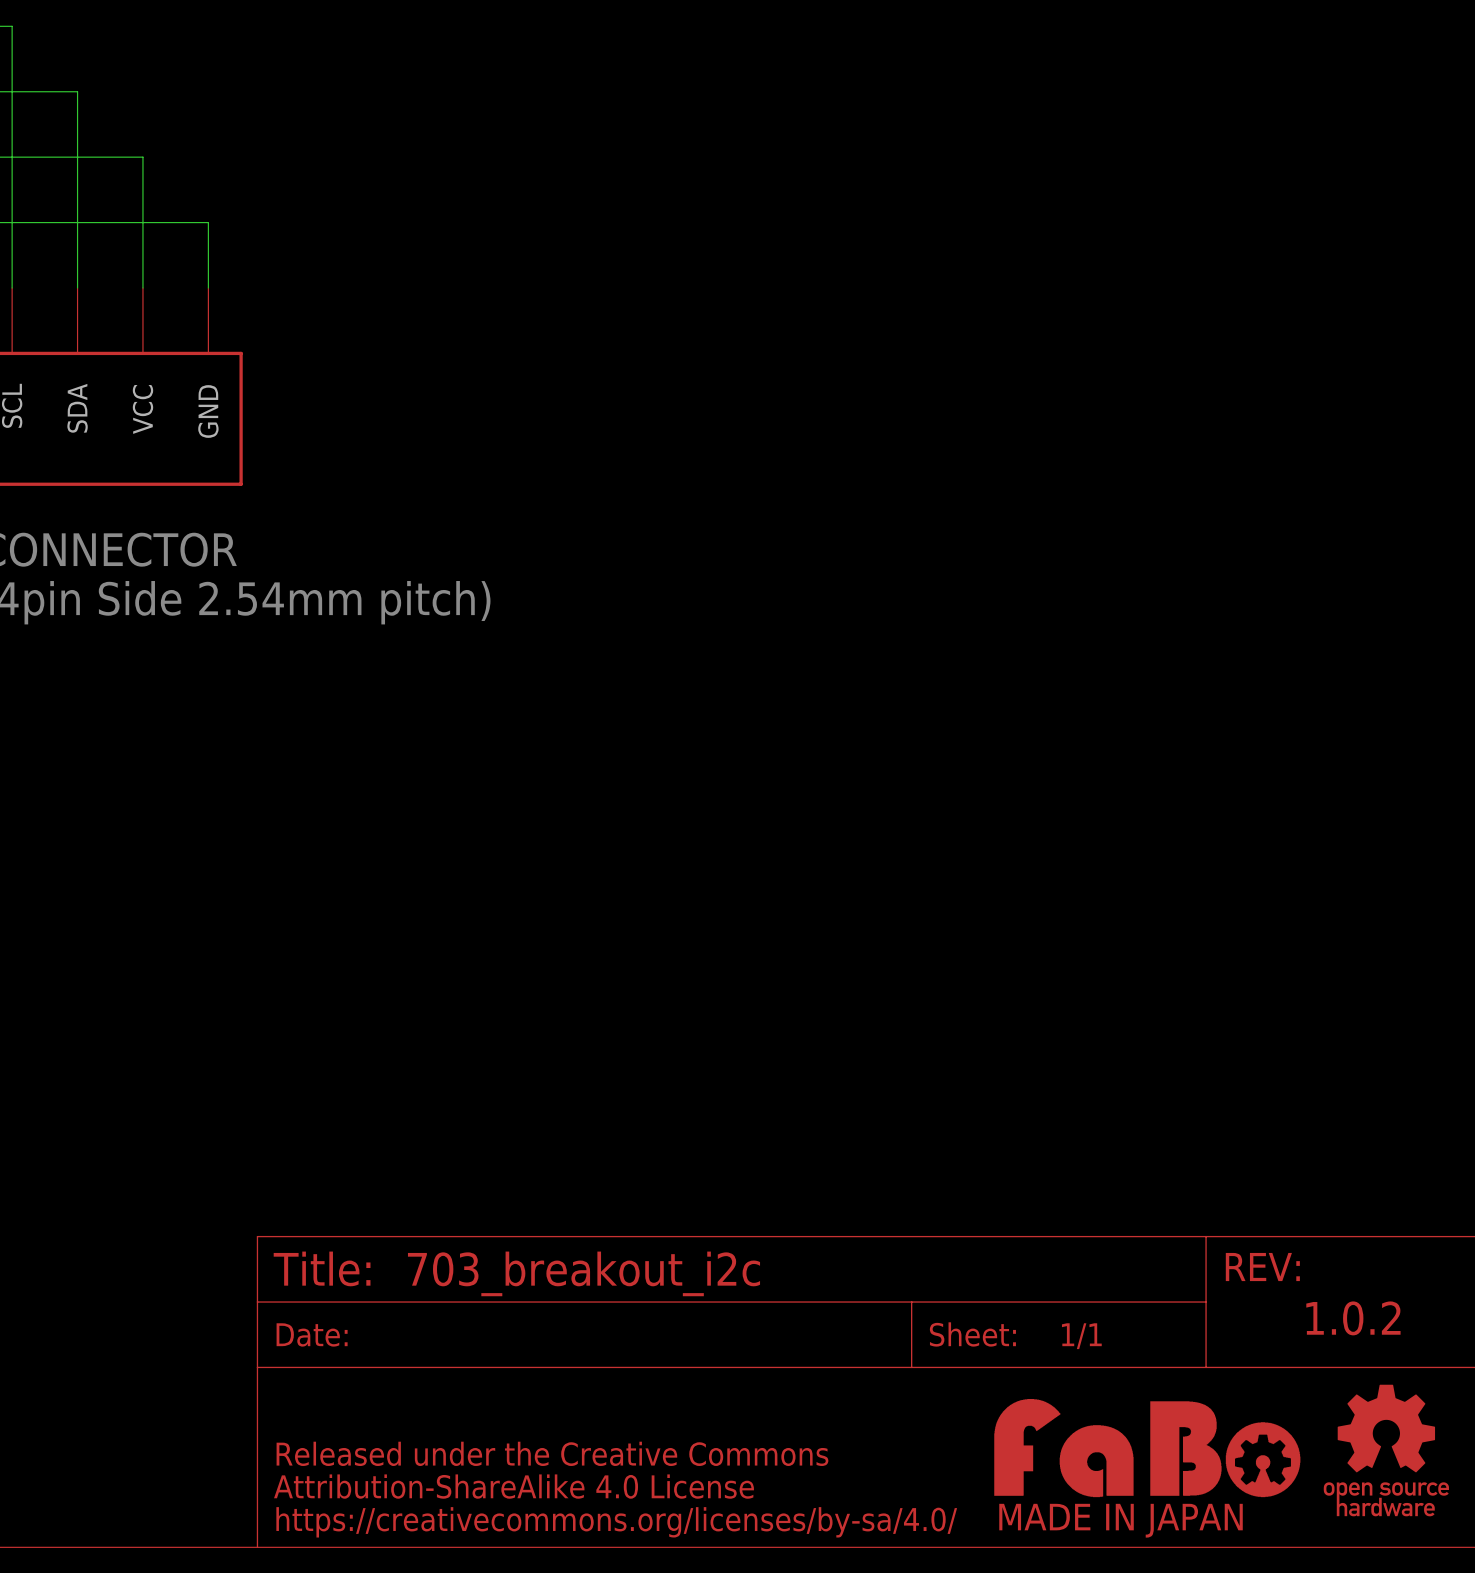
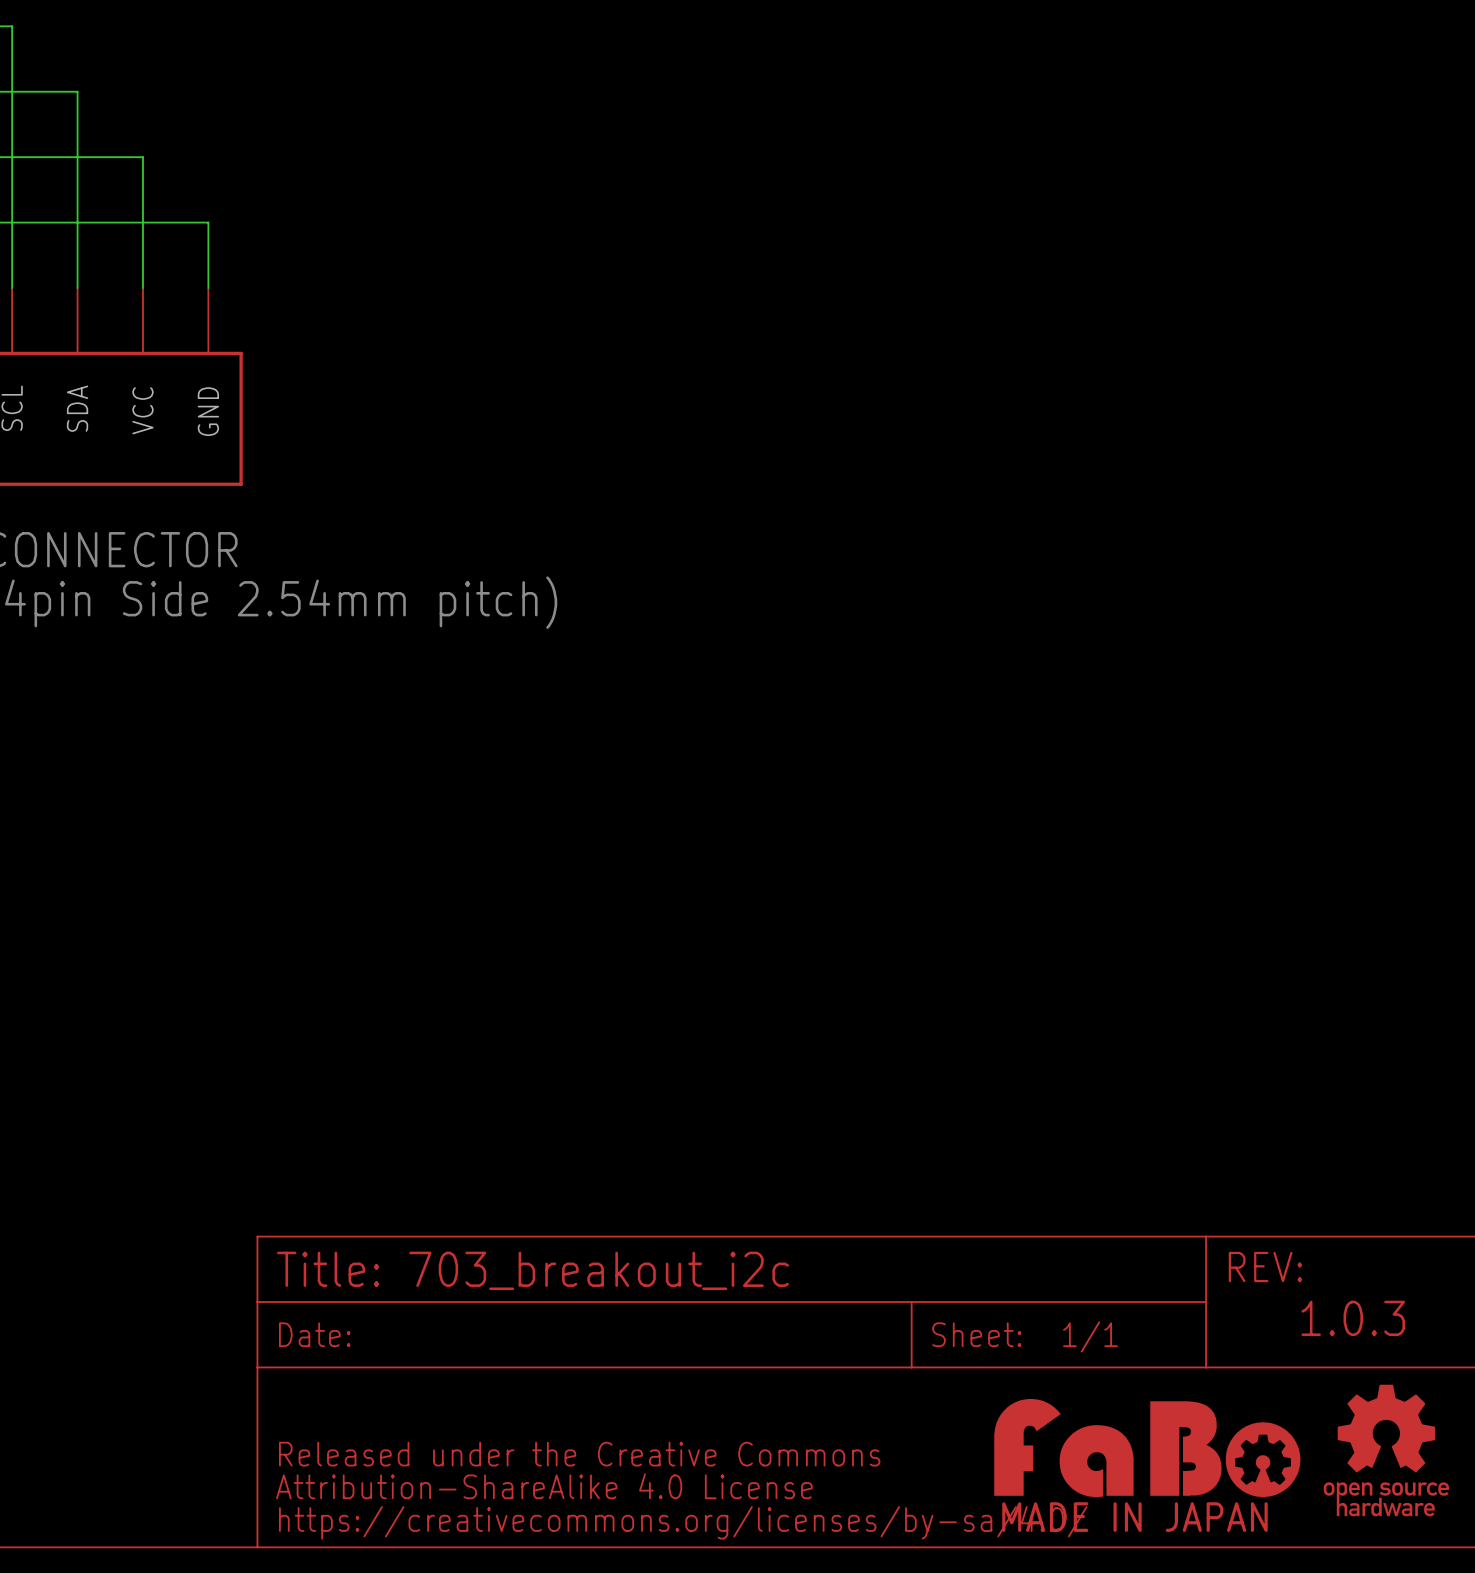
text: 1.0.2 (1353, 1318) -> 1.0.3 (1353, 1318)

